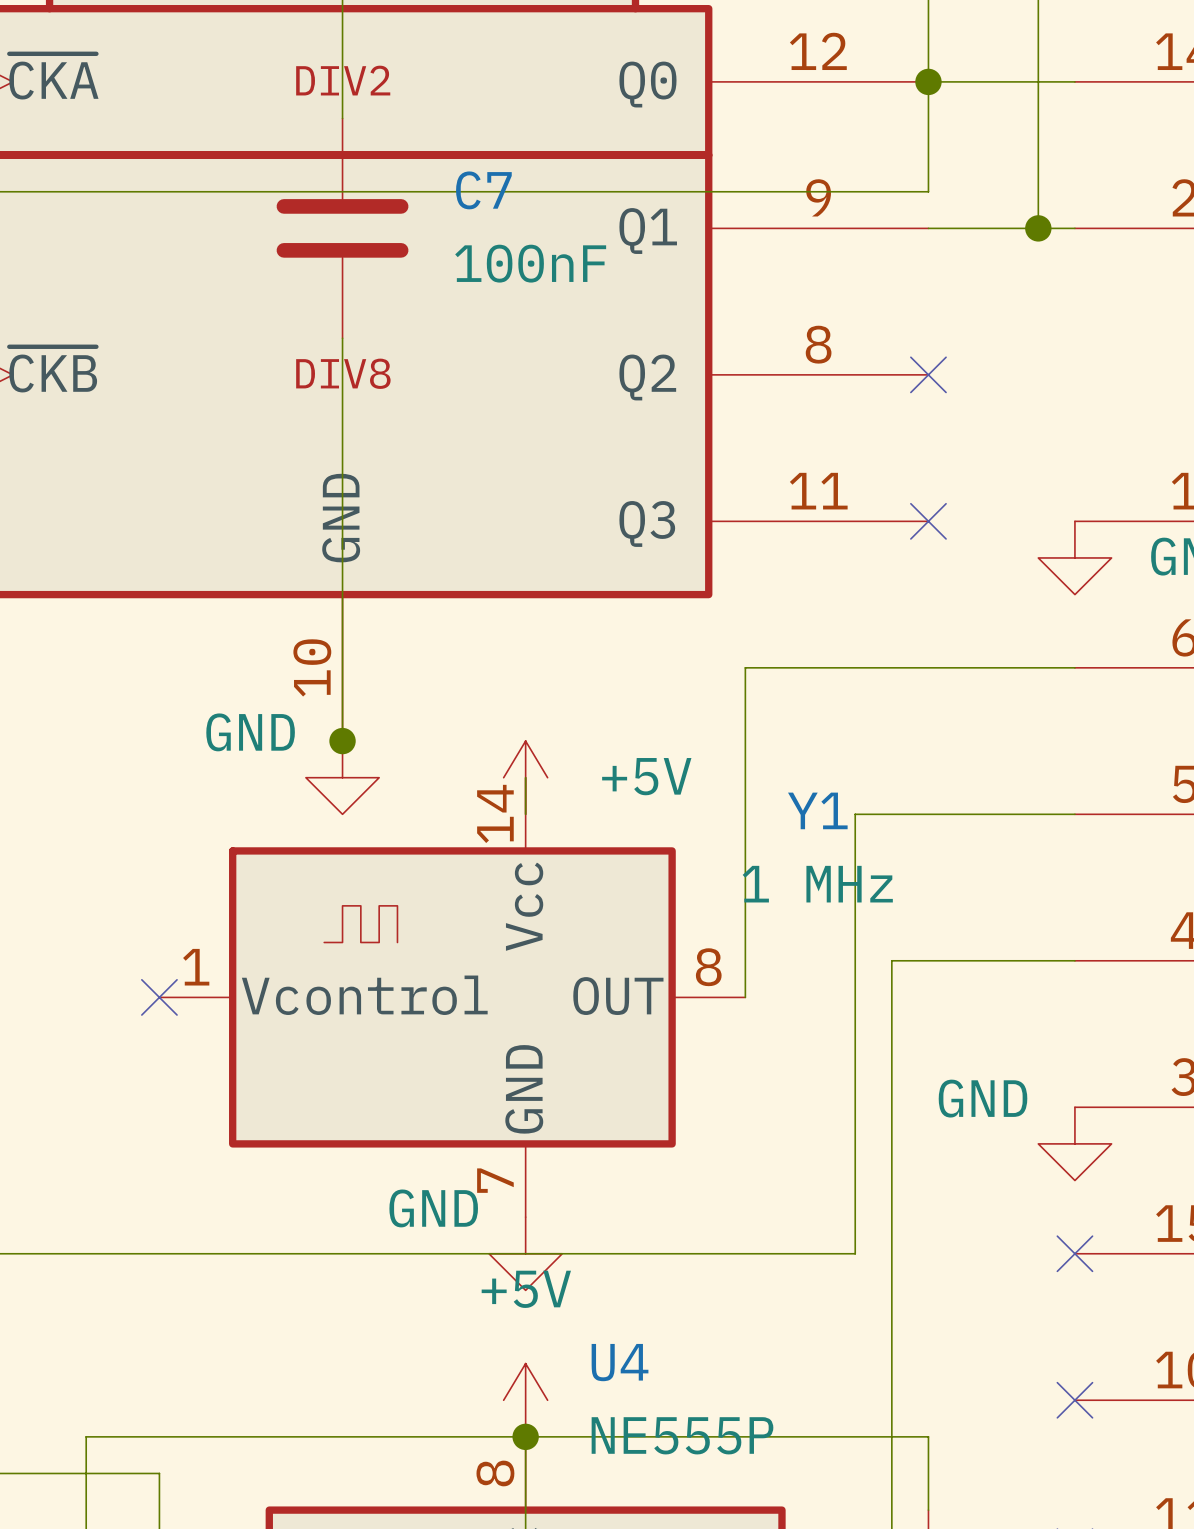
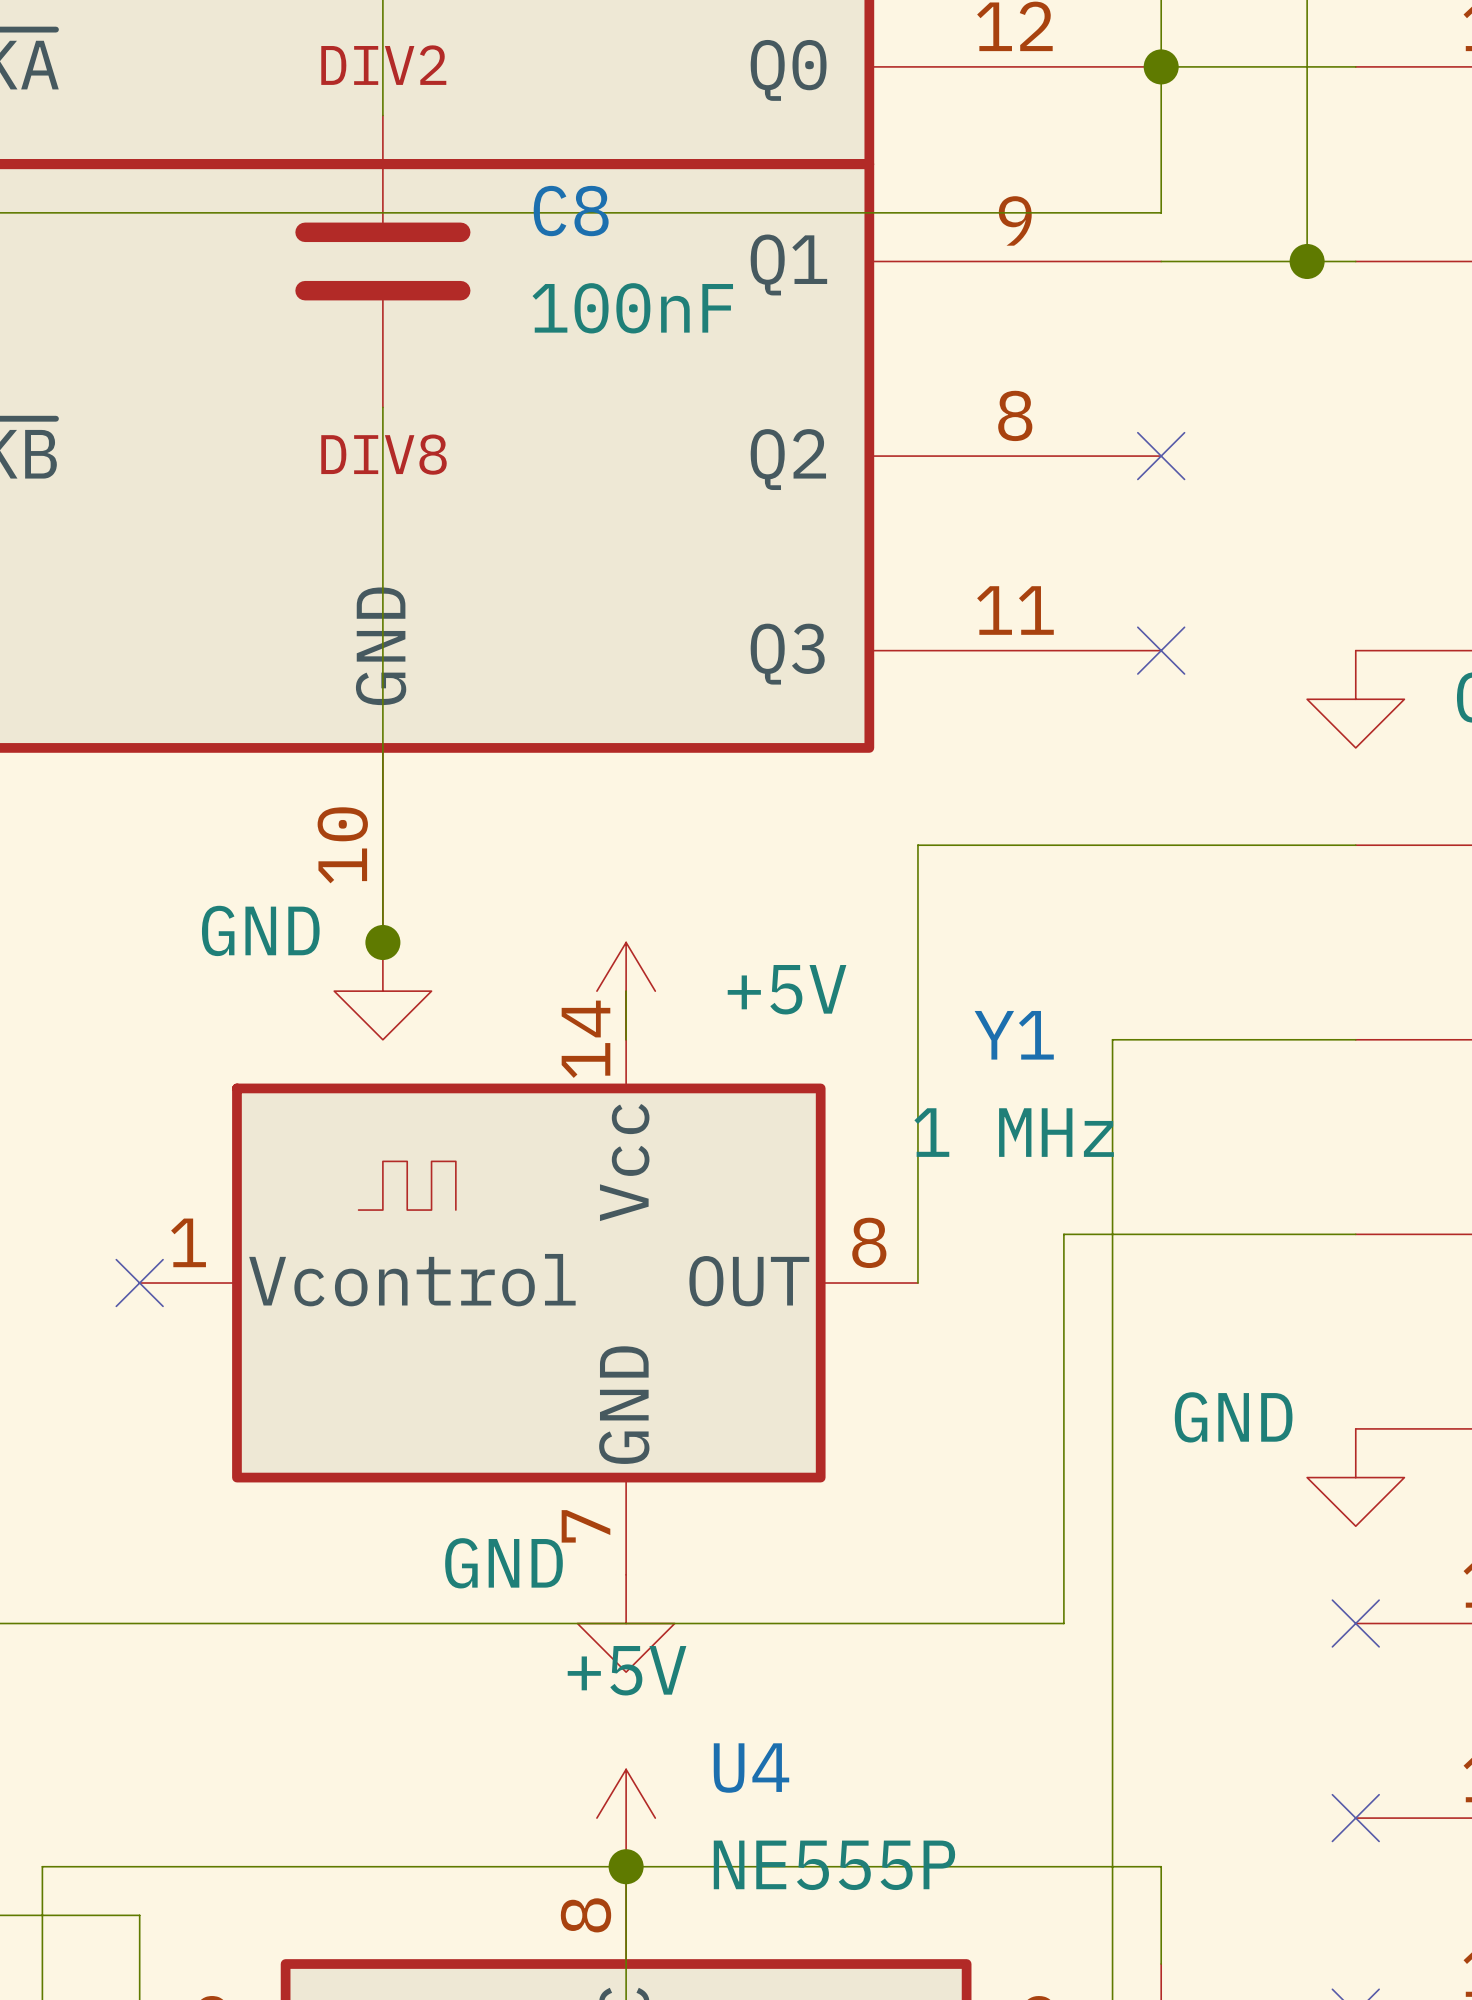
C7 name: C7 (483, 190) -> C8 (571, 211)
wire: (891, 814) (855, 814) (855, 960) -> (1112, 1039) (1112, 1234) (1063, 1234)

